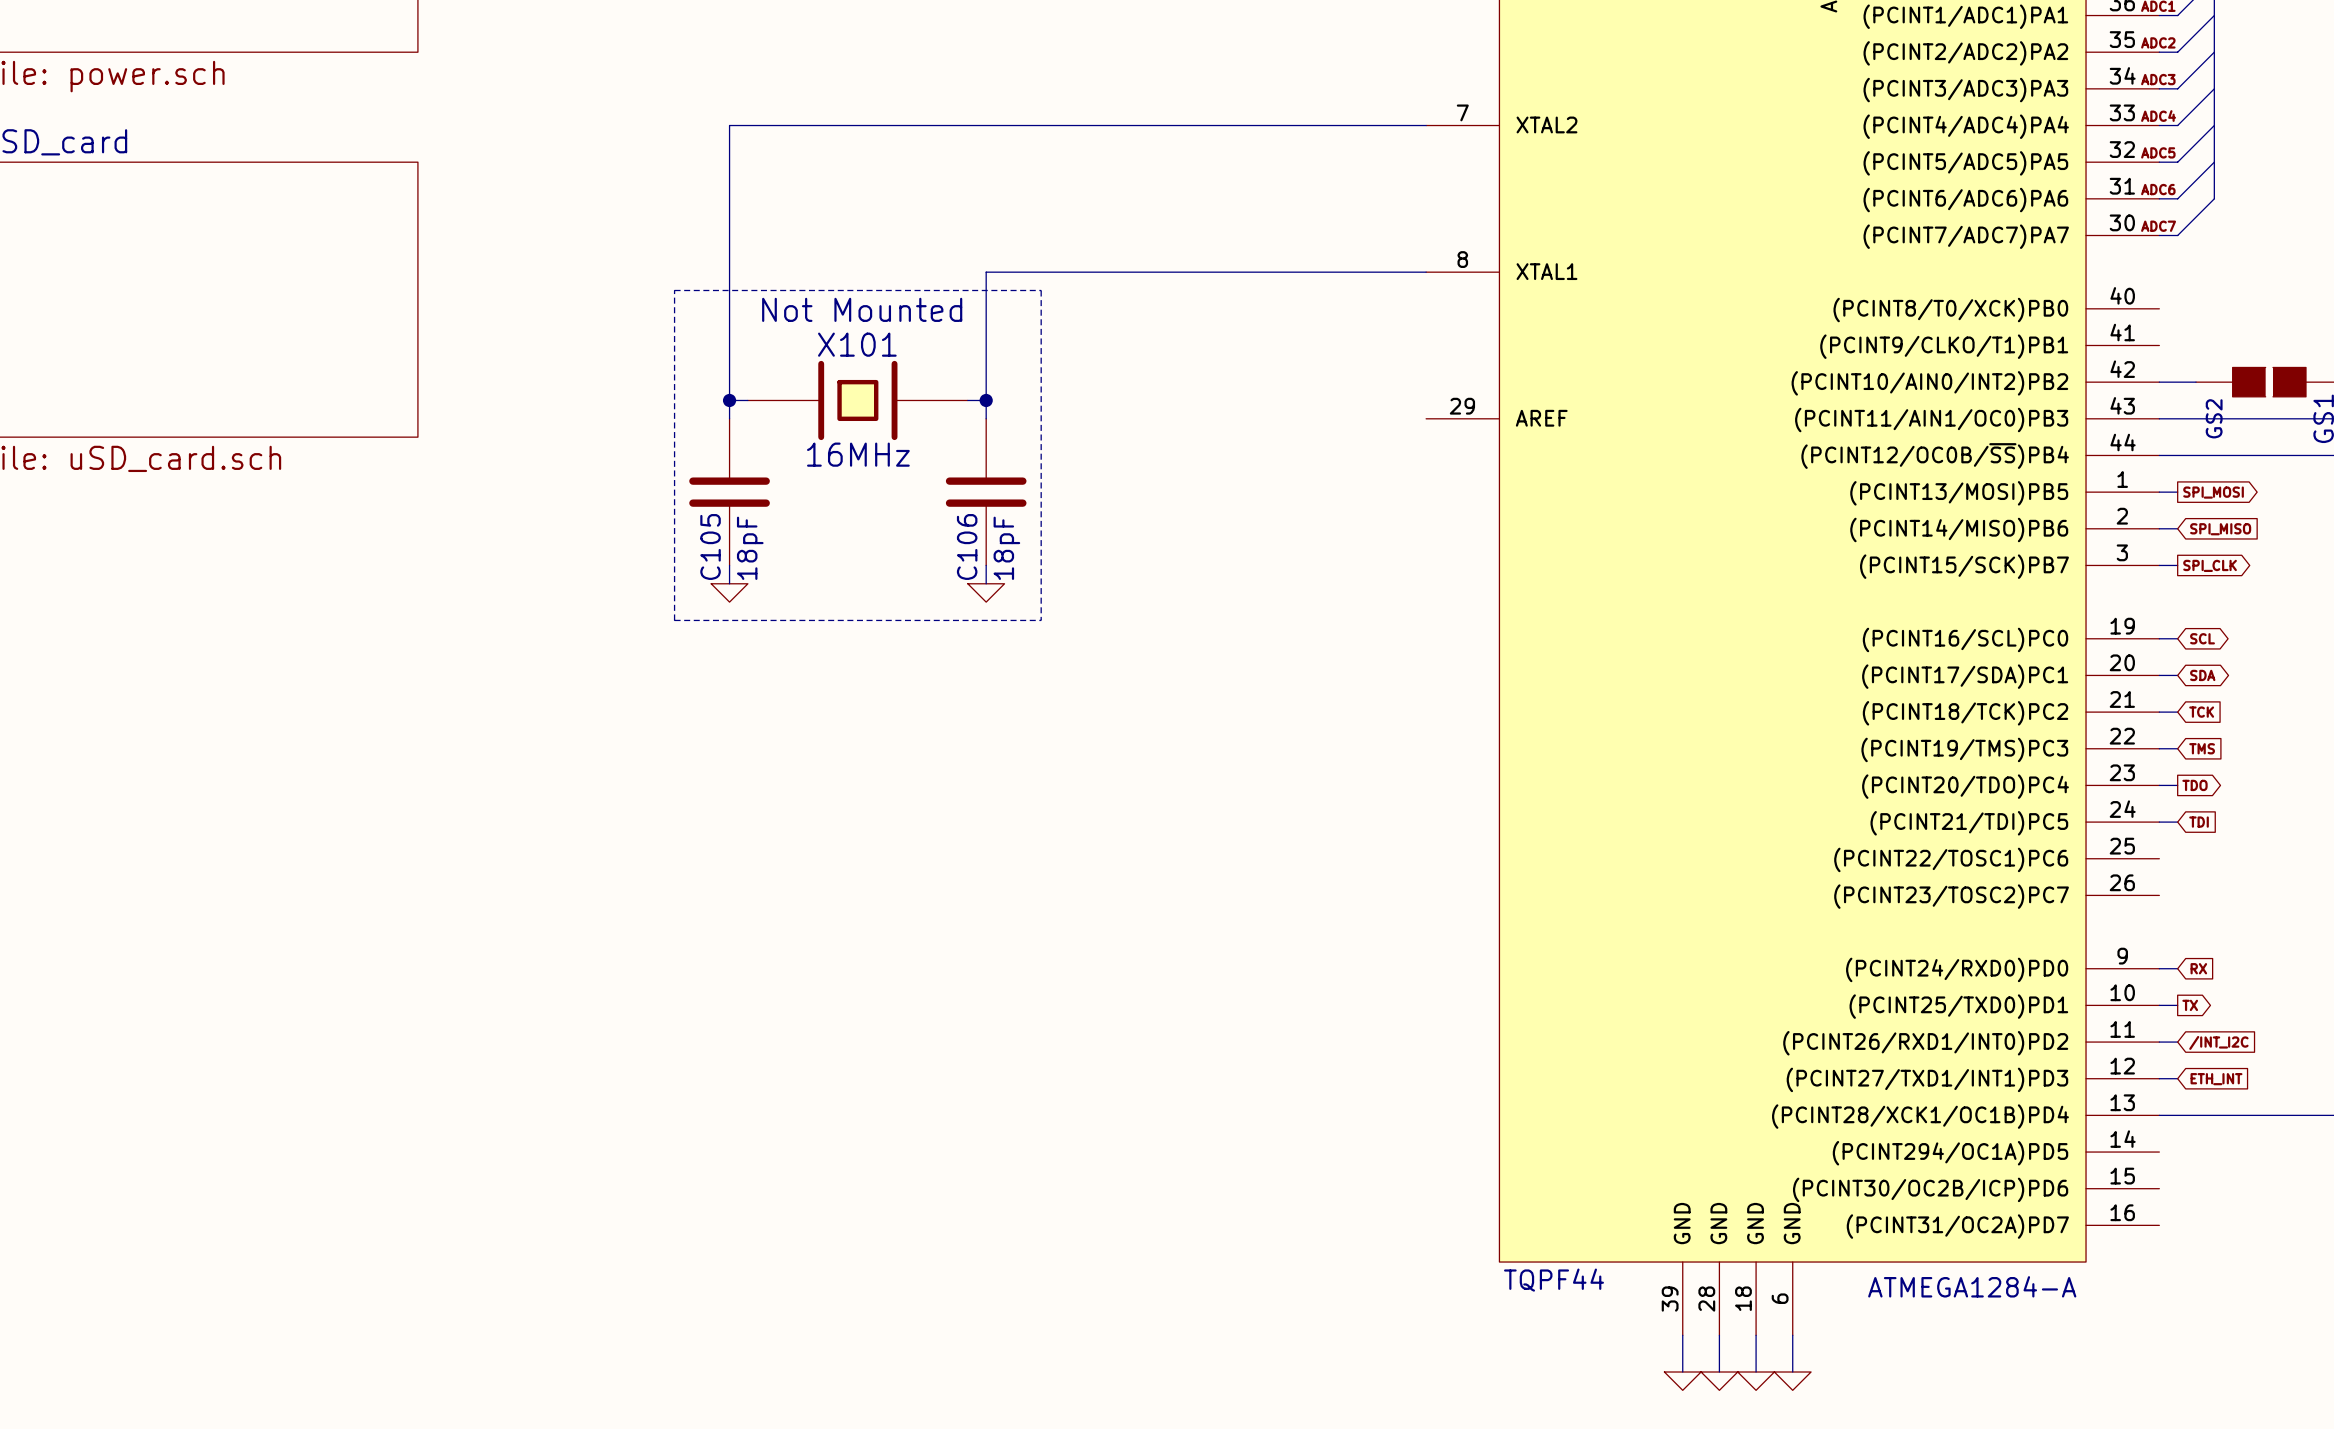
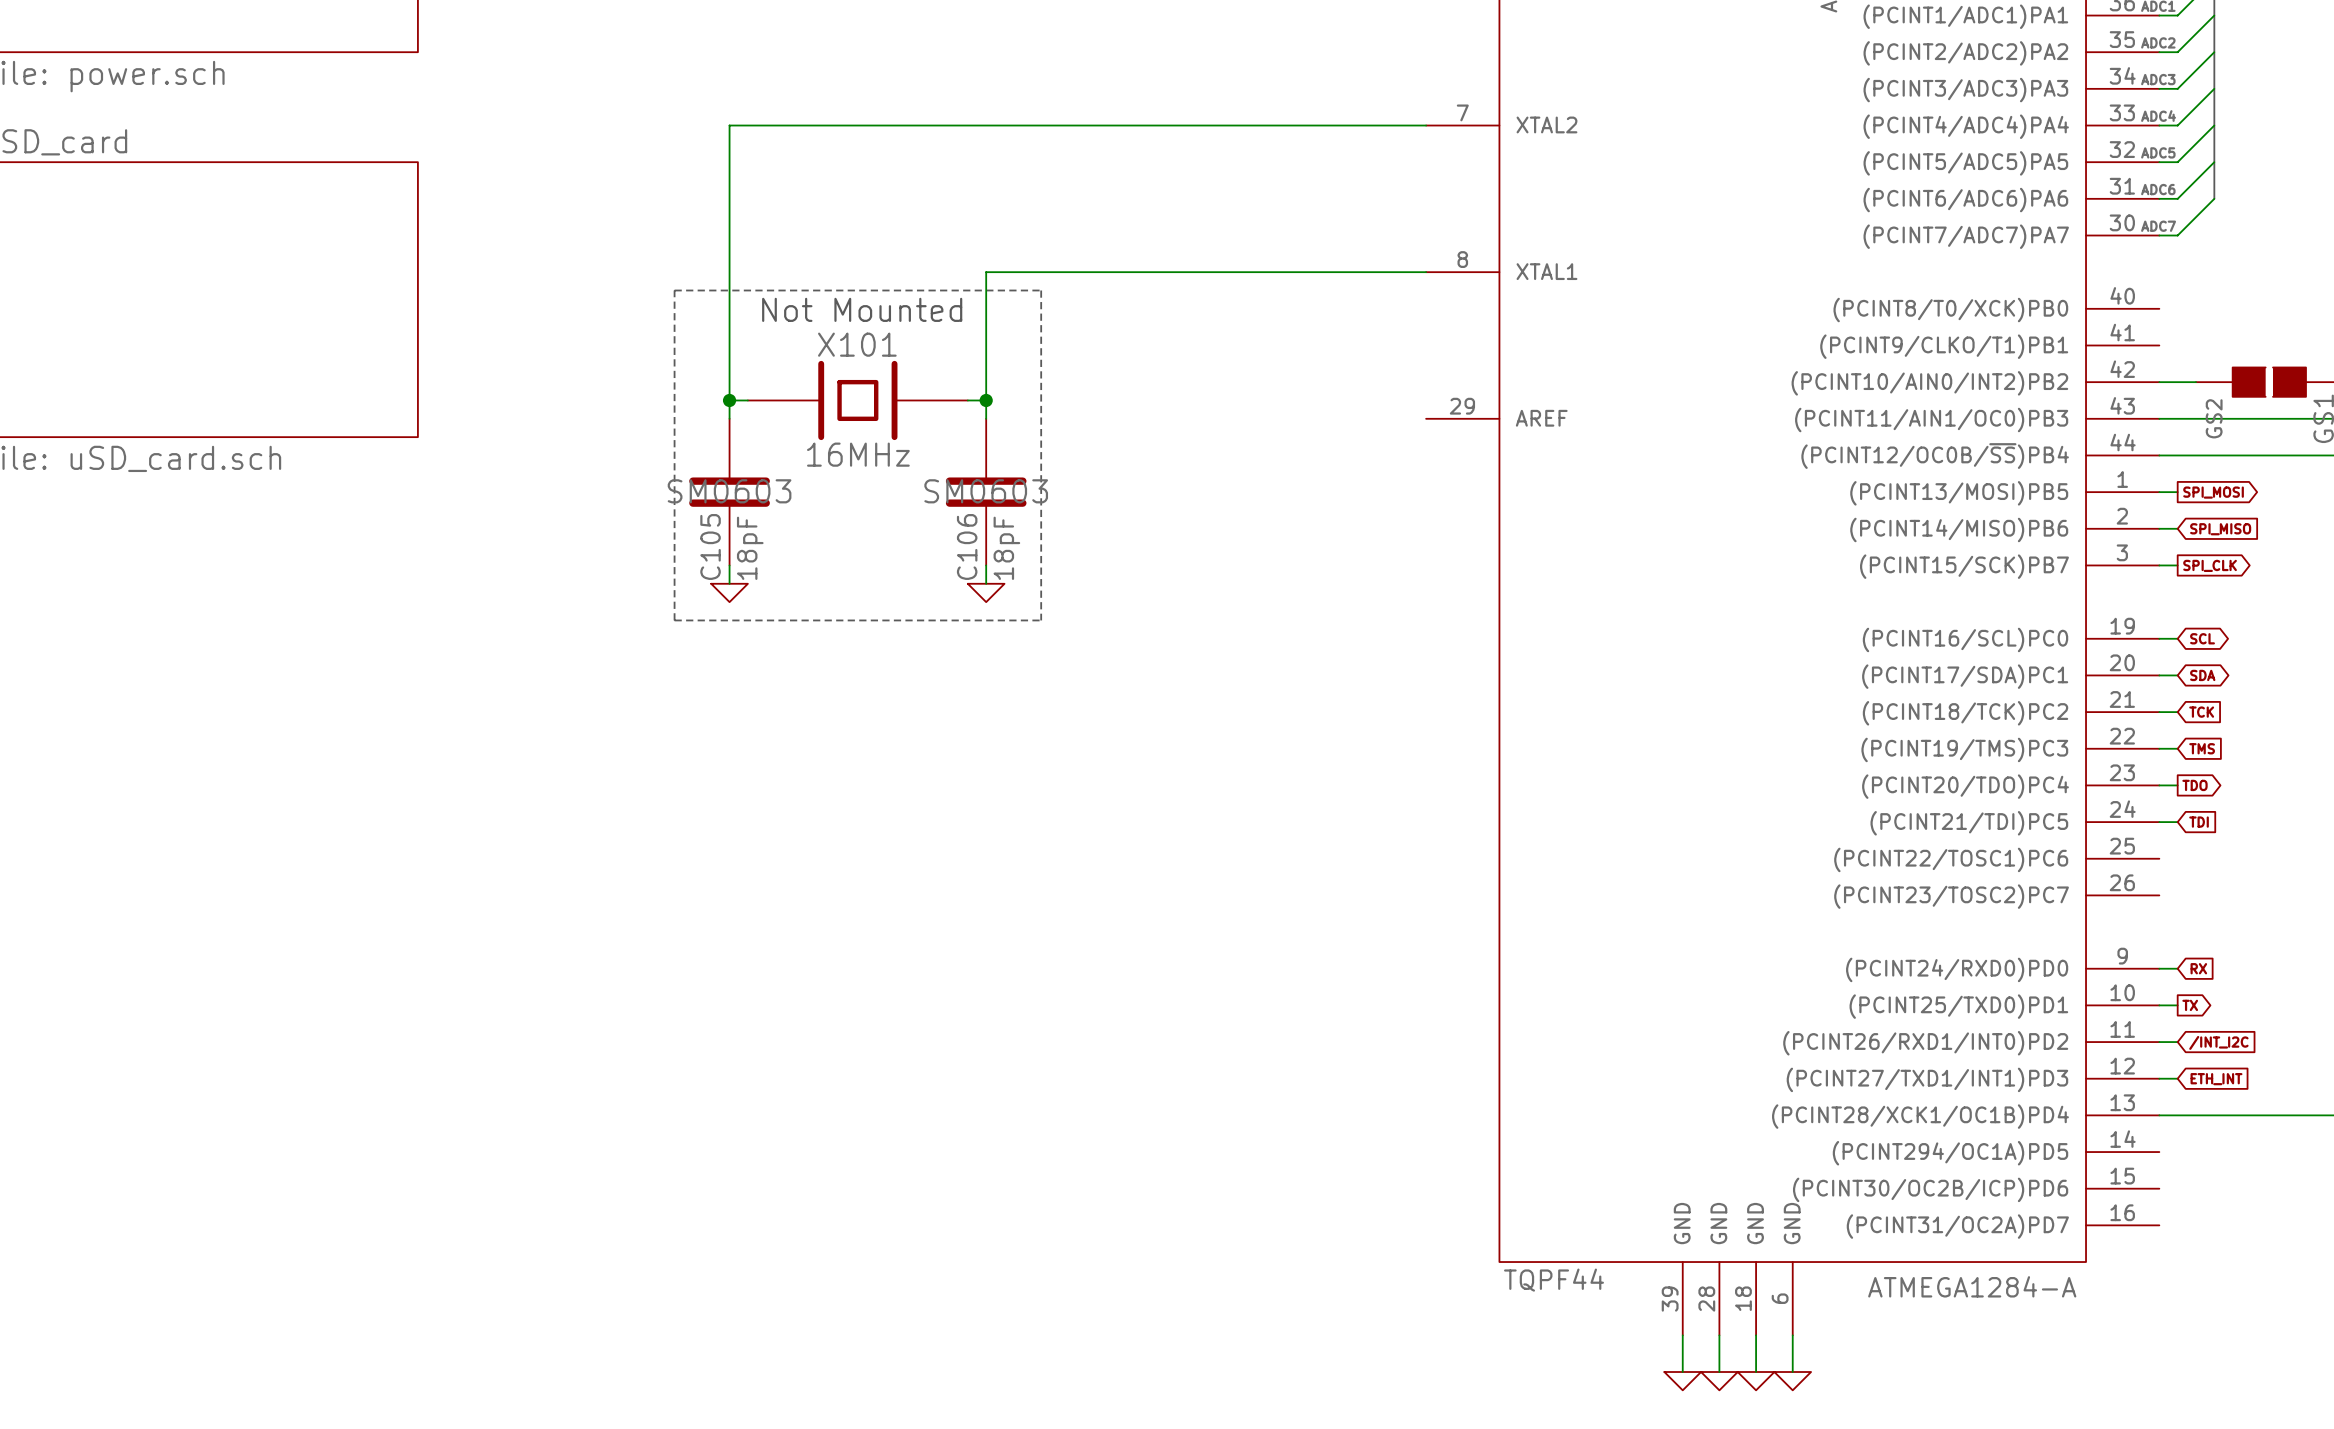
C105 text: none -> SM0603 (729, 491)
C106 text: none -> SM0603 (986, 491)

